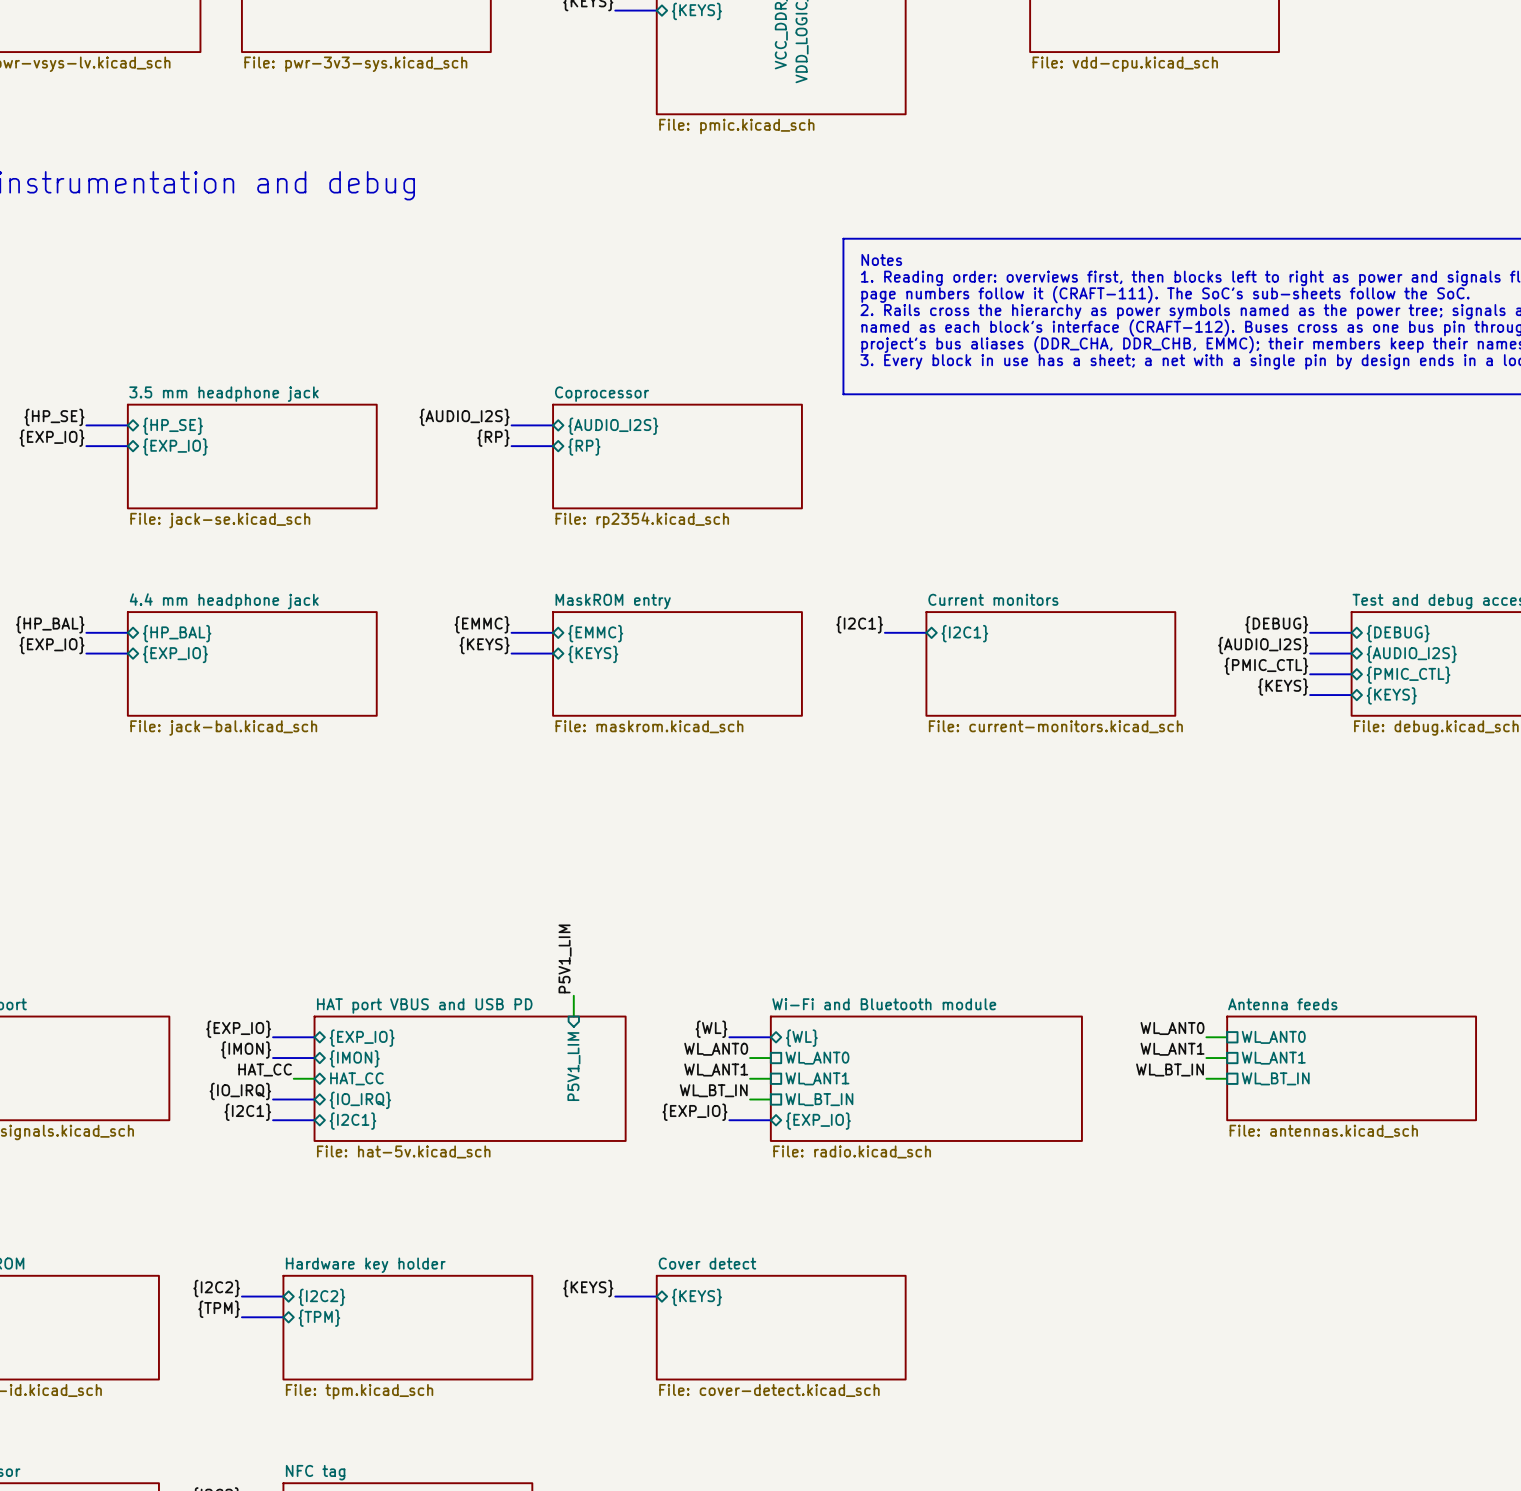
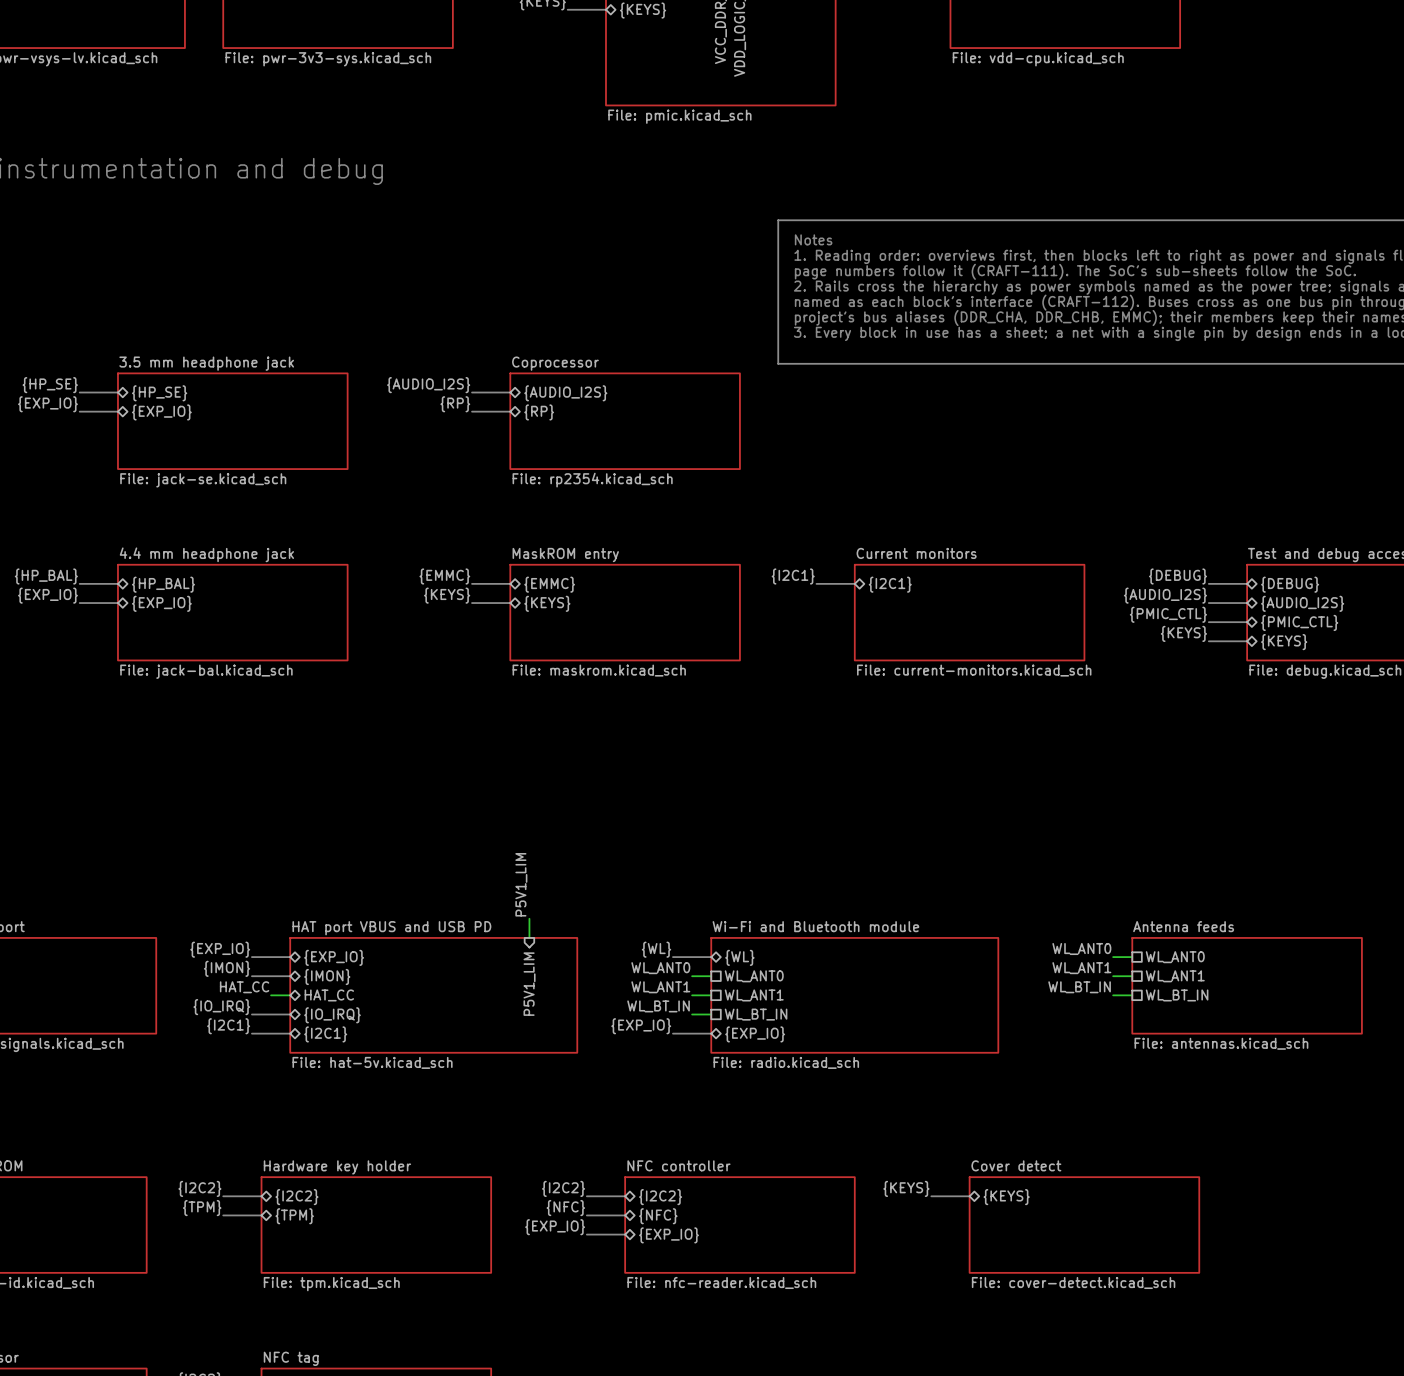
label: {KEYS} (588, 1288) -> none
label: none -> {I2C2} (563, 1188)
label: none -> {KEYS} (906, 1188)
bus: (615, 1296) (636, 1296) -> (605, 1196) (625, 1196)
bus: none -> (931, 1196) (969, 1196)
sheet pin: {KEYS} (696, 1297) -> none
sheet pin: none -> {I2C2} (660, 1197)
sheet pin: none -> {KEYS} (1006, 1197)
label: none -> {NFC} (565, 1208)
bus: none -> (586, 1215) (625, 1215)
sheet pin: none -> {NFC} (658, 1216)
sheet Cover detect: File: cover-detect.kicad_sch (781, 1327) -> none
sheet NFC controller: none -> File: nfc-reader.kicad_sch (739, 1225)
sheet Cover detect: none -> File: cover-detect.kicad_sch (1084, 1225)
label: none -> {EXP_IO} (555, 1227)
bus: none -> (586, 1234) (625, 1234)
sheet pin: none -> {EXP_IO} (669, 1235)

